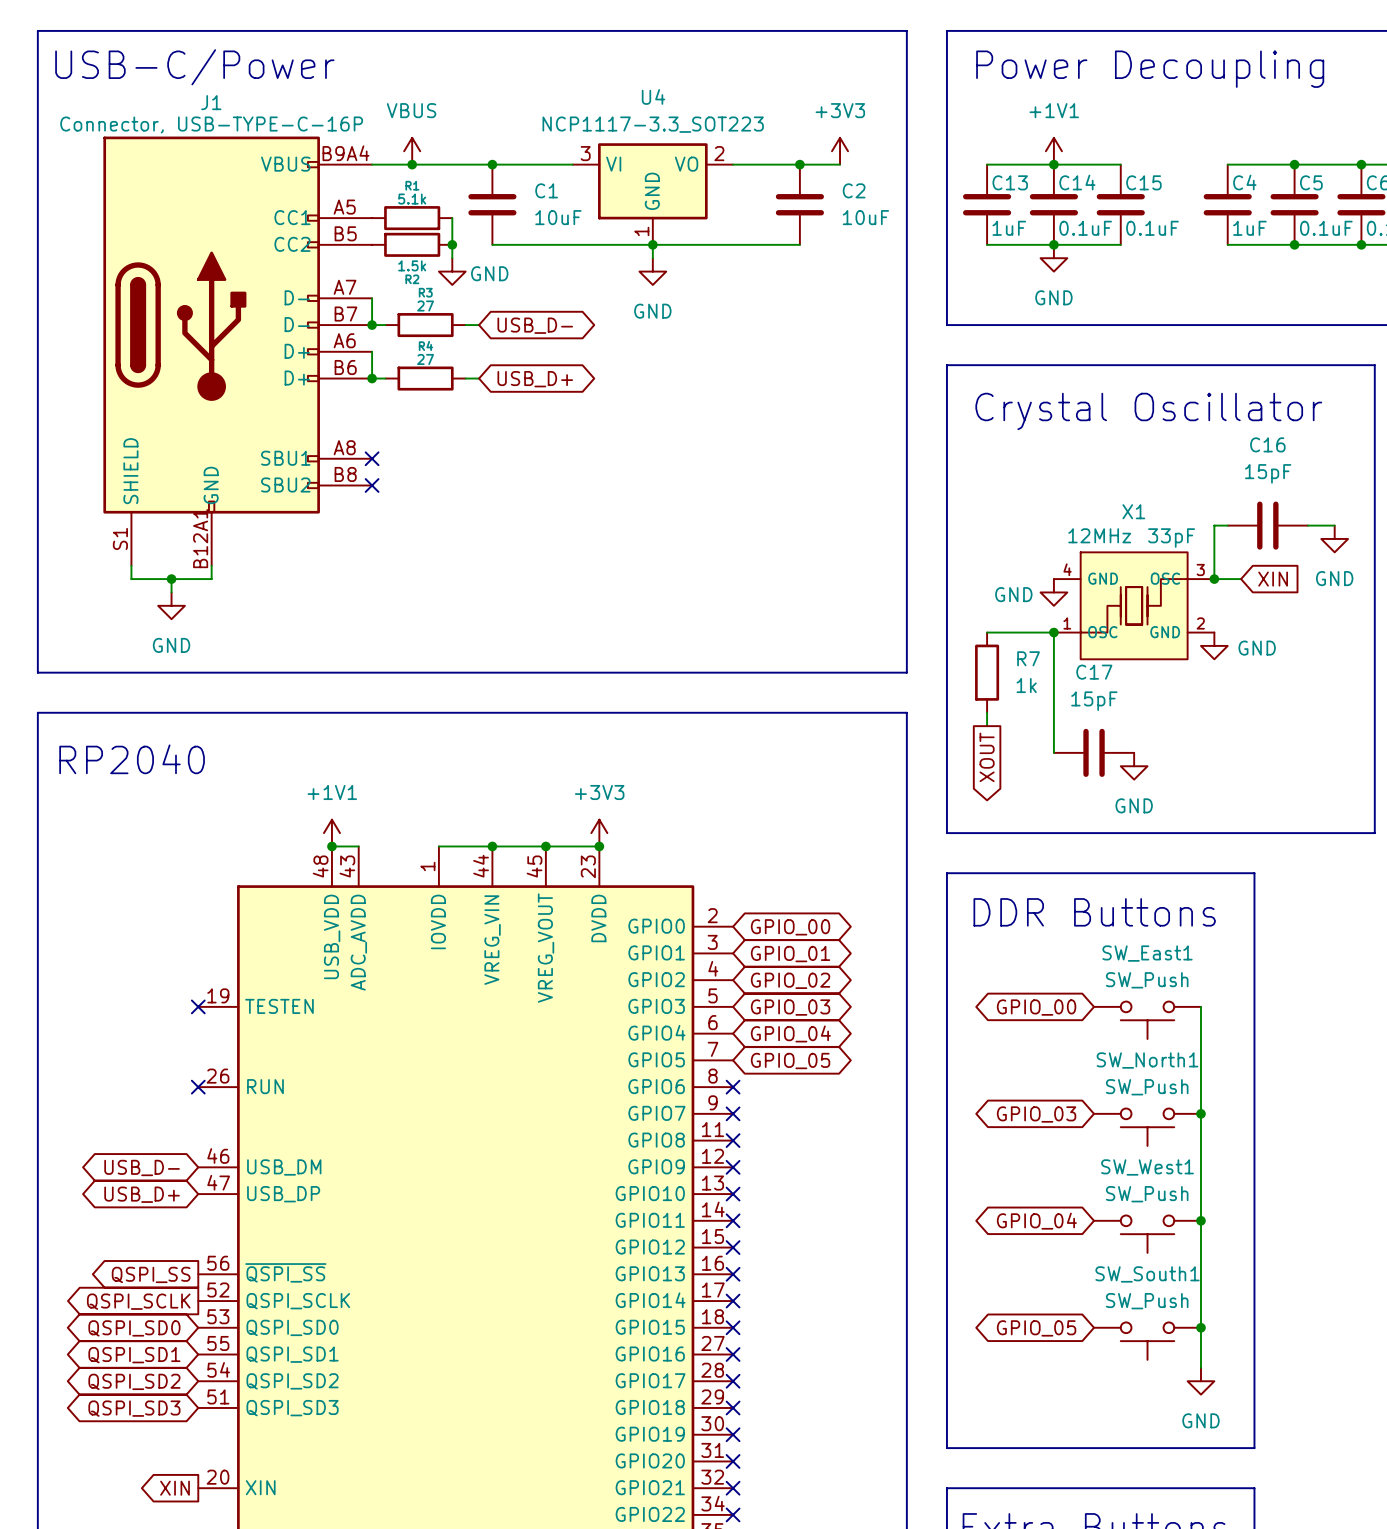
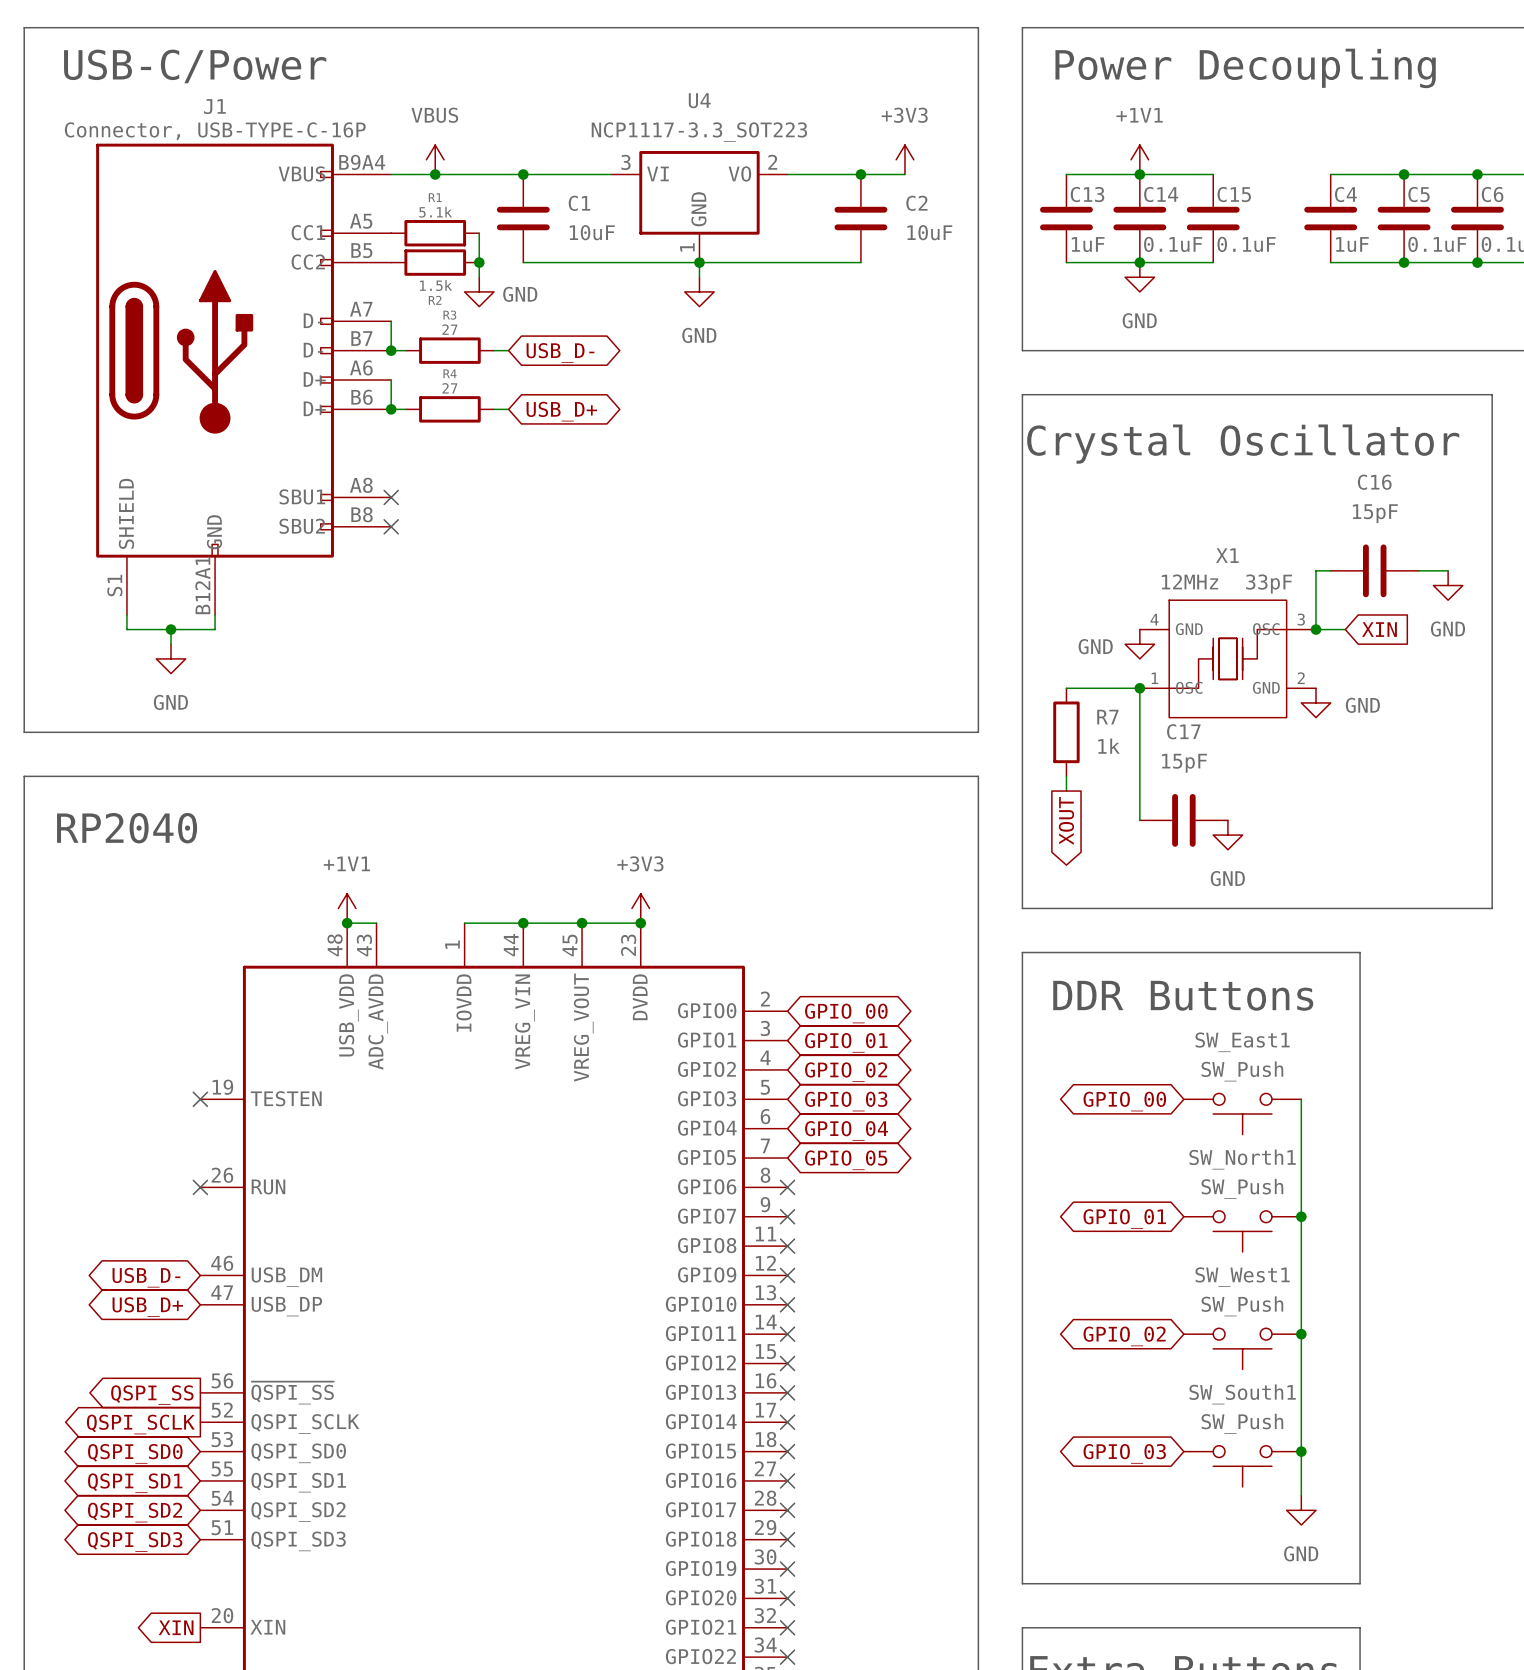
global label: GPIO_03 (1036, 1114) -> GPIO_01 (1124, 1218)
global label: GPIO_04 (1036, 1221) -> GPIO_02 (1124, 1336)
global label: GPIO_05 (1036, 1328) -> GPIO_03 (1124, 1453)

